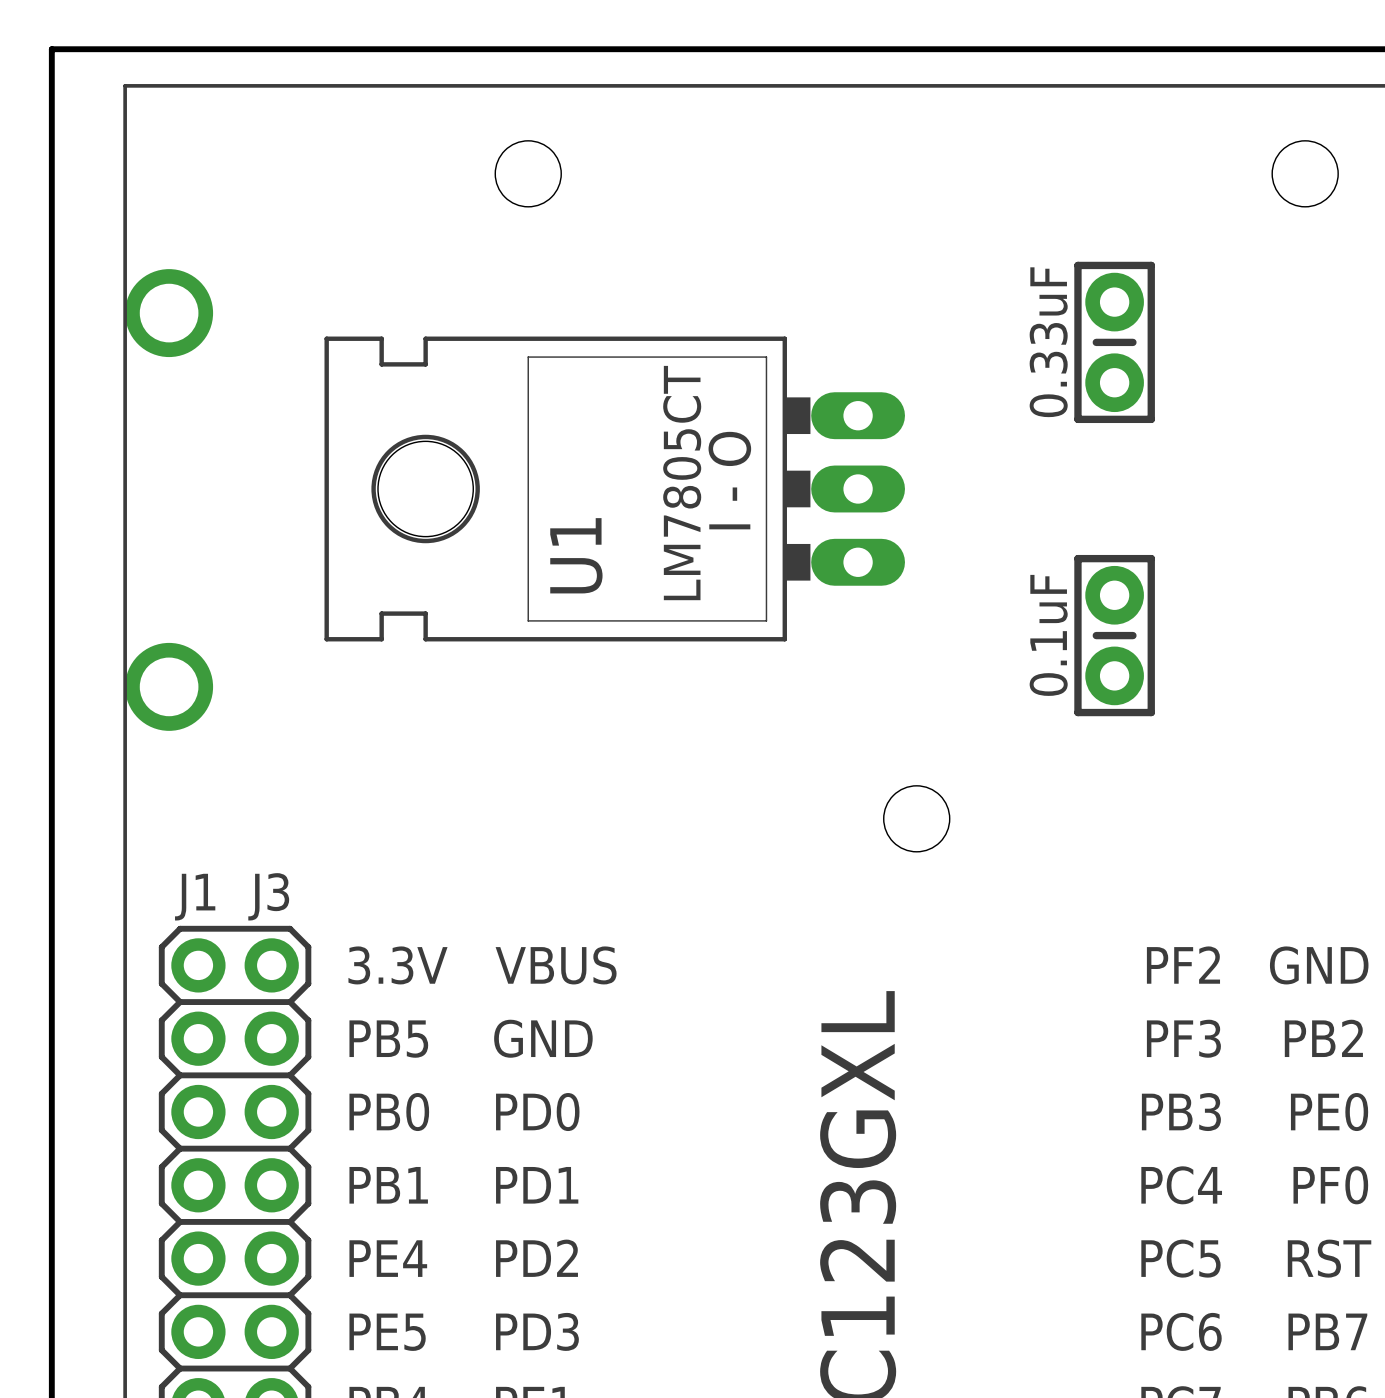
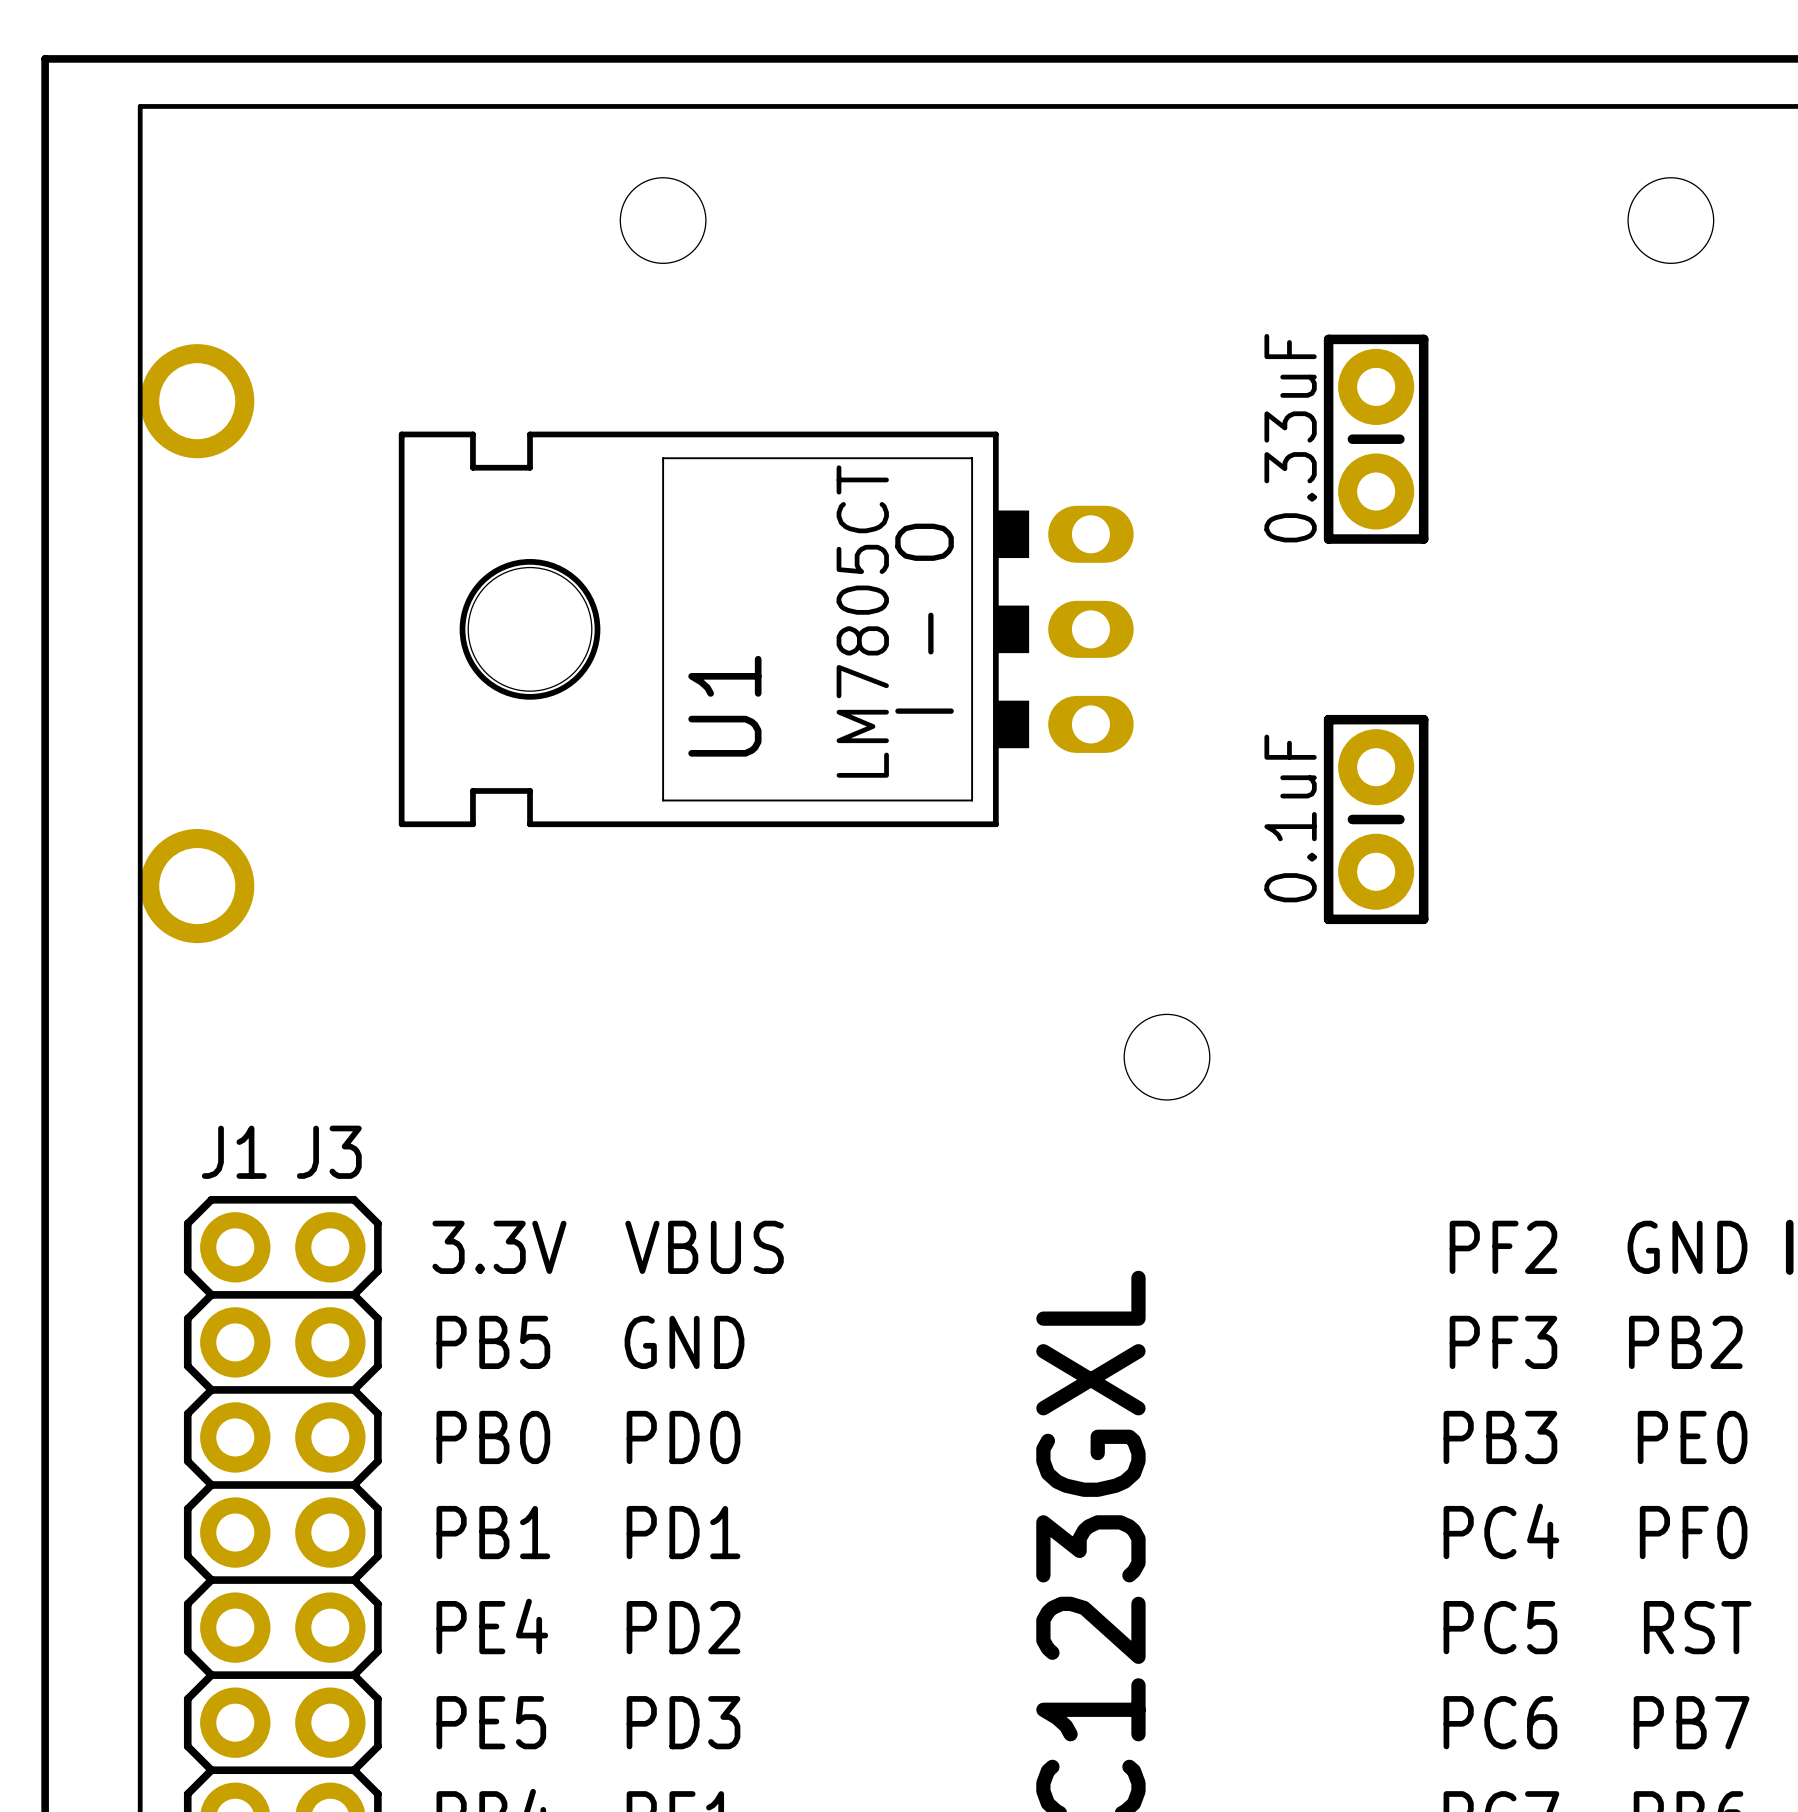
U1 footprint: [324, 336, 905, 642] -> [398, 431, 1134, 828]
text position: 0.33uF (1048, 342) -> 0.33uF (1290, 438)
part position: (1114, 342) -> (1376, 439)
text position: 0.1uF (1048, 635) -> 0.1uF (1290, 818)
part position: (1114, 635) -> (1376, 819)

